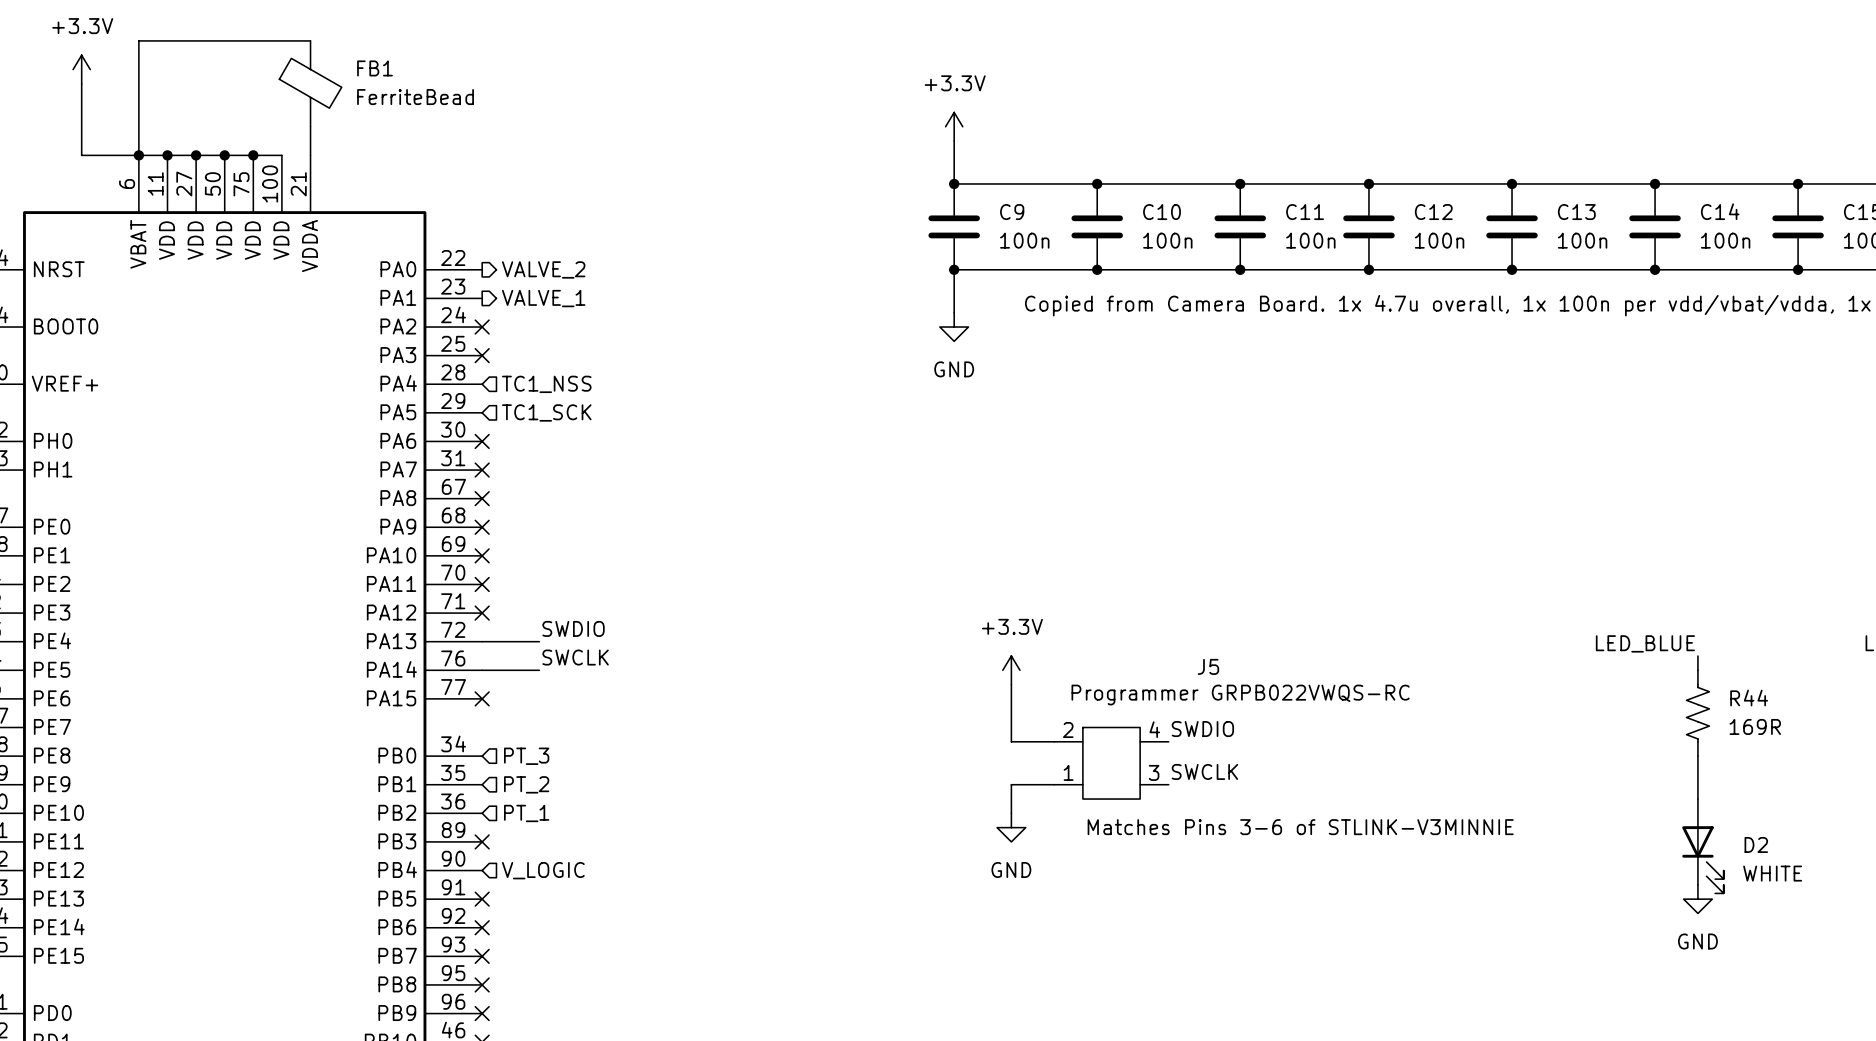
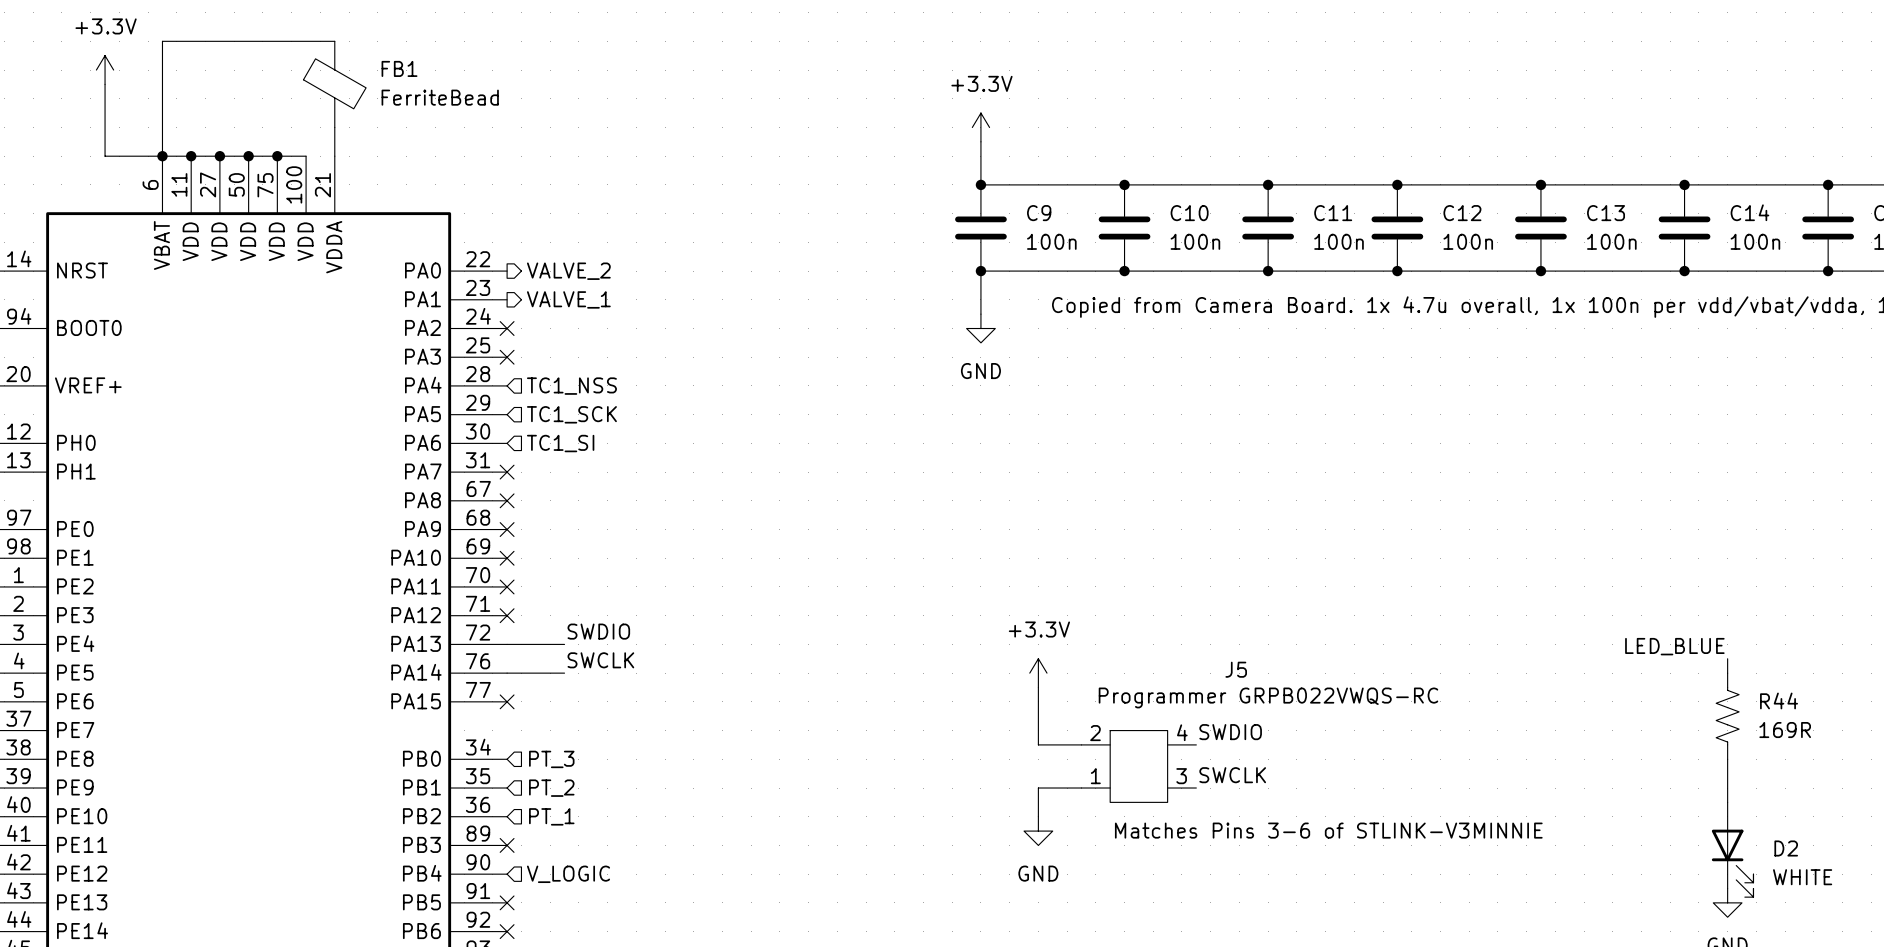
no-connect mark: (482, 441) -> none
hierarchical label: none -> TC1_SI (560, 443)

